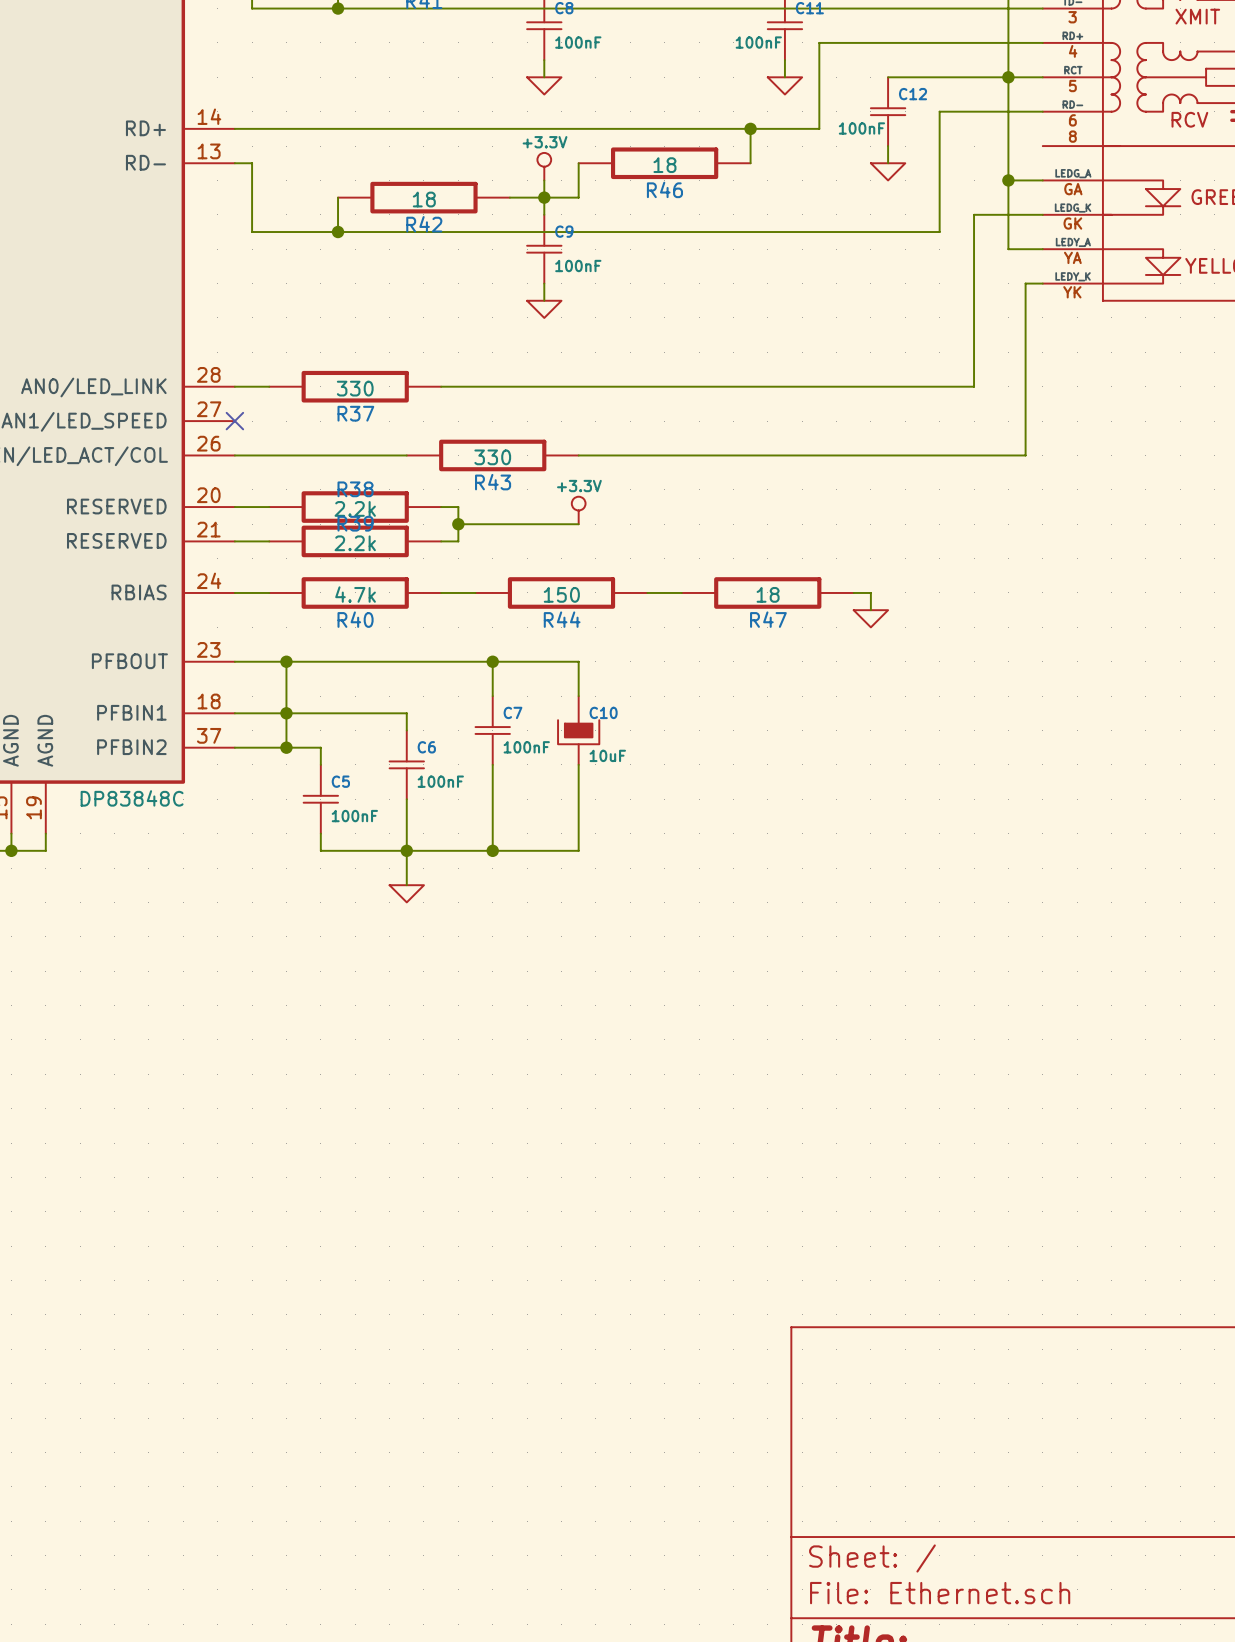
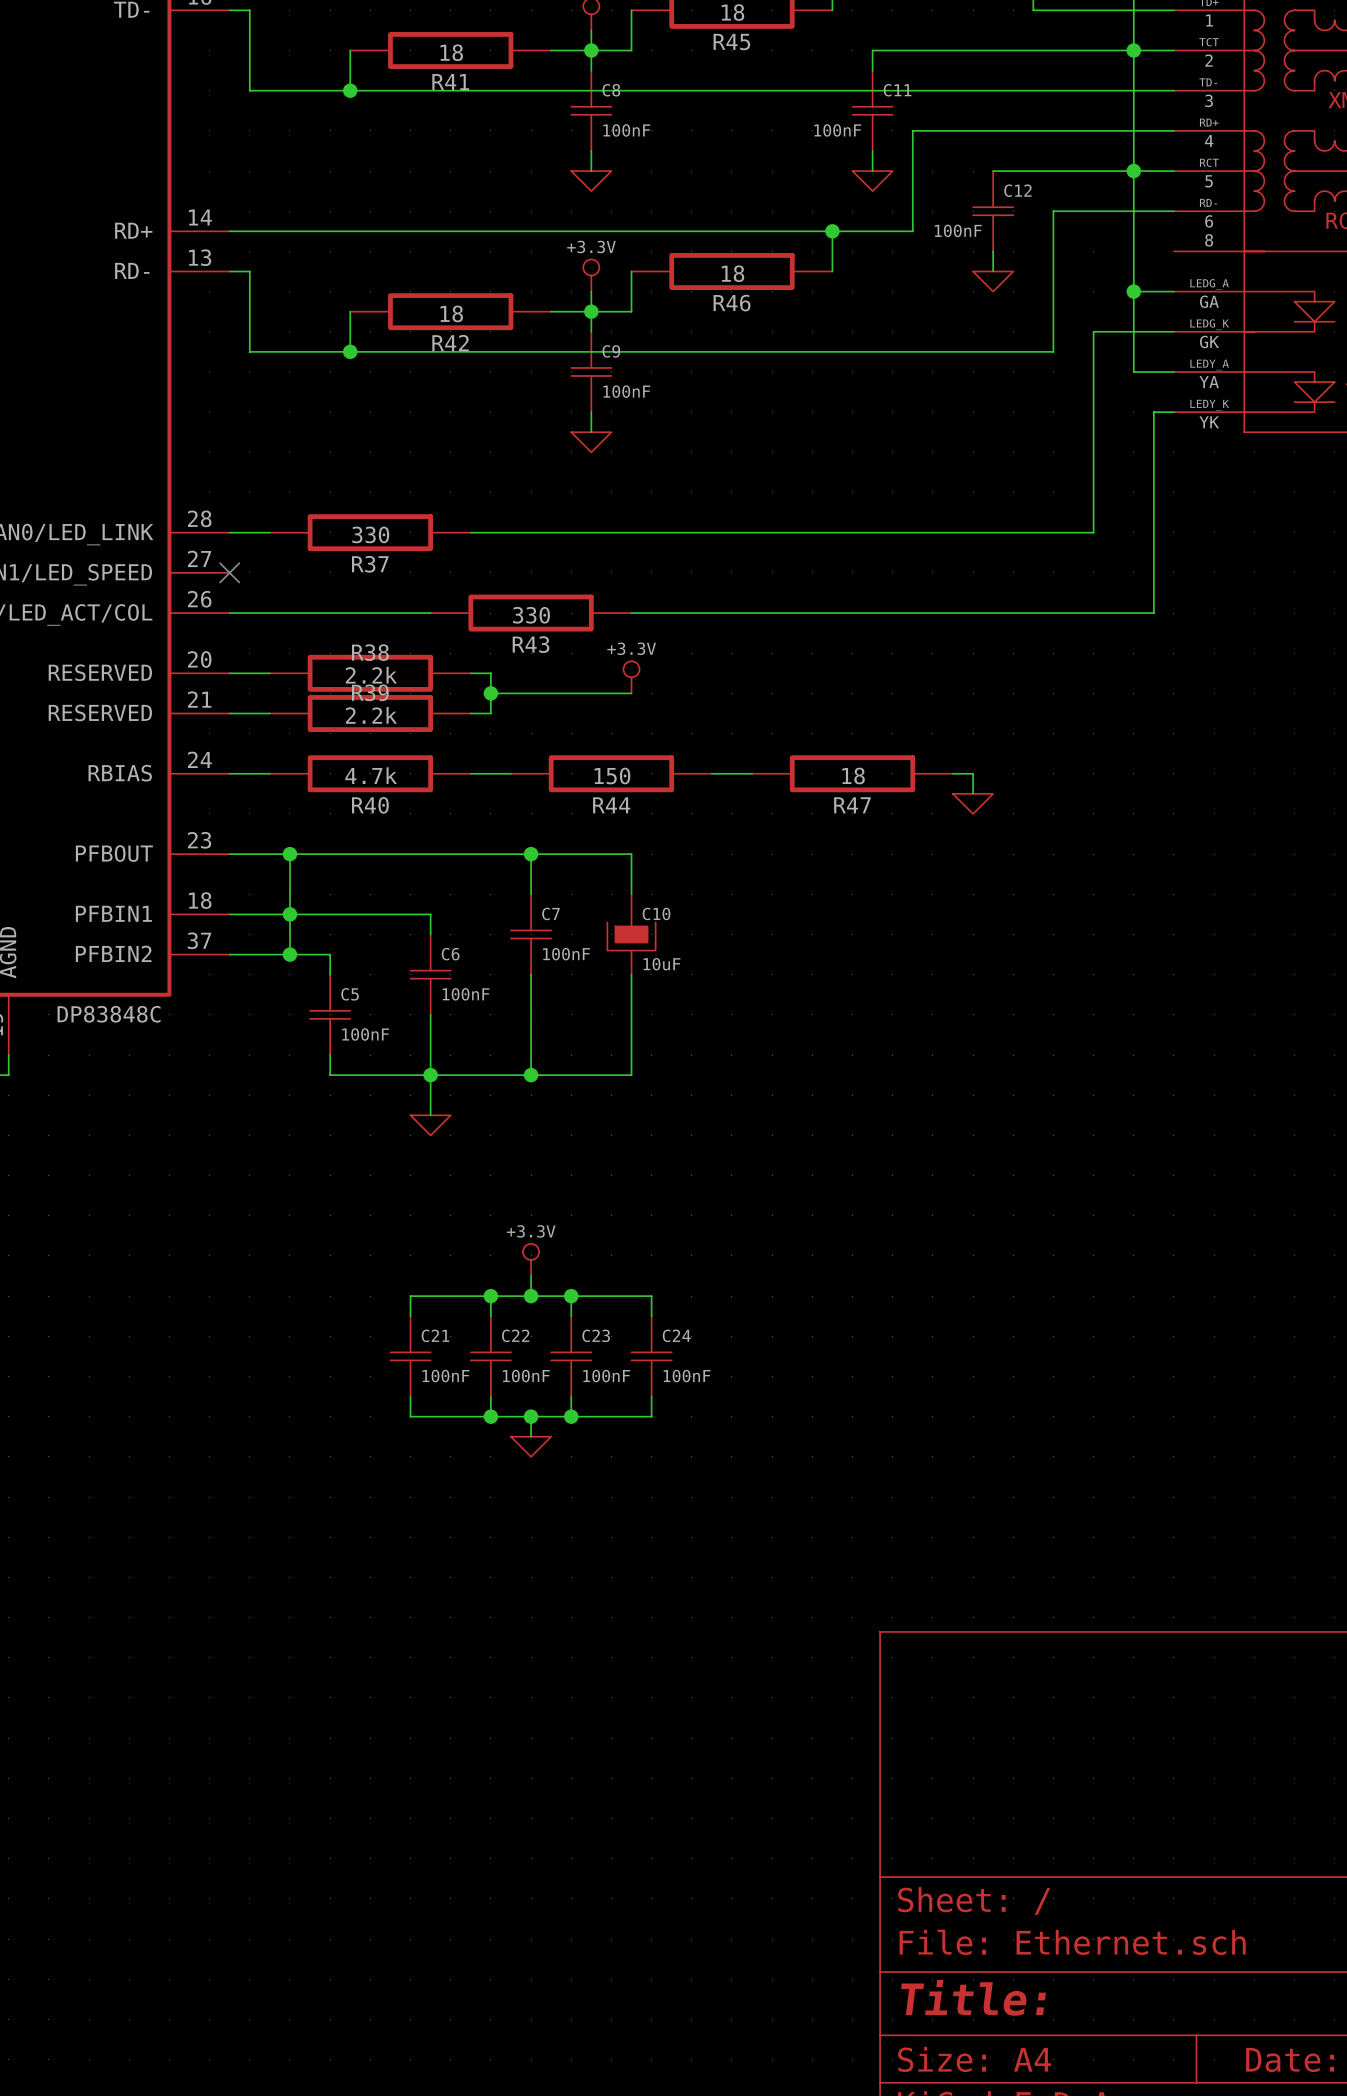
power symbol: none -> +3.3V (531, 1259)
wire: none -> (531, 1276) (531, 1296)
wire: none -> (490, 1296) (490, 1316)
junction: none -> (490, 1296)
junction: none -> (531, 1296)
wire: none -> (571, 1296) (571, 1316)
junction: none -> (571, 1296)
wire: none -> (410, 1316) (410, 1296) (651, 1296) (651, 1316)
C21: none -> 100nF (410, 1356)
C22: none -> 100nF (490, 1356)
C23: none -> 100nF (571, 1356)
C24: none -> 100nF (651, 1356)
wire: none -> (410, 1396) (410, 1416) (651, 1416) (651, 1396)
wire: none -> (490, 1396) (490, 1416)
wire: none -> (571, 1396) (571, 1416)
junction: none -> (490, 1416)
wire: none -> (531, 1416) (531, 1436)
junction: none -> (531, 1416)
junction: none -> (571, 1416)
power symbol: none -> (531, 1446)

